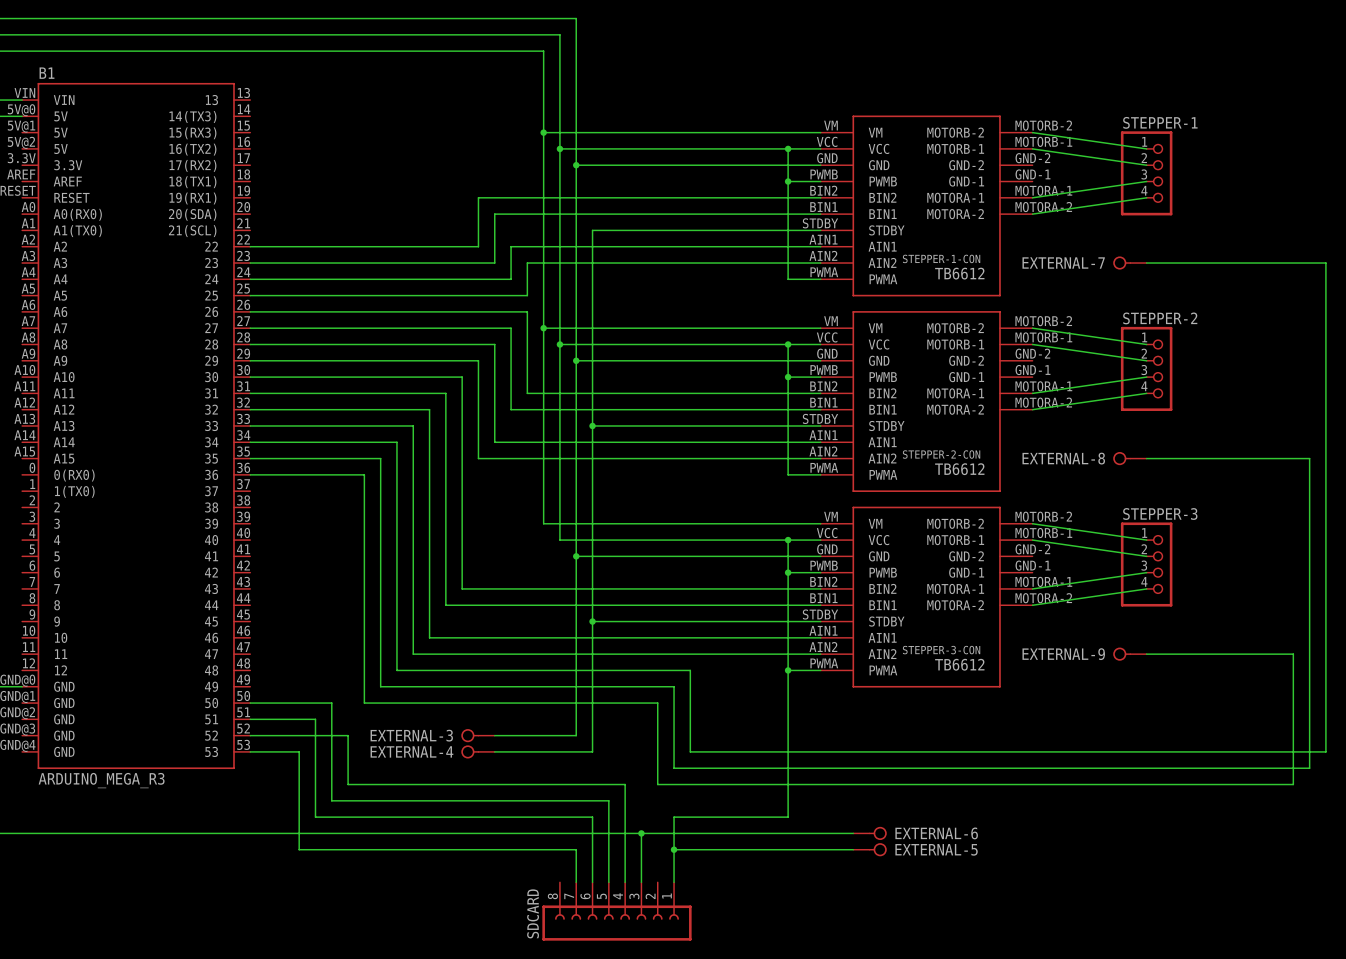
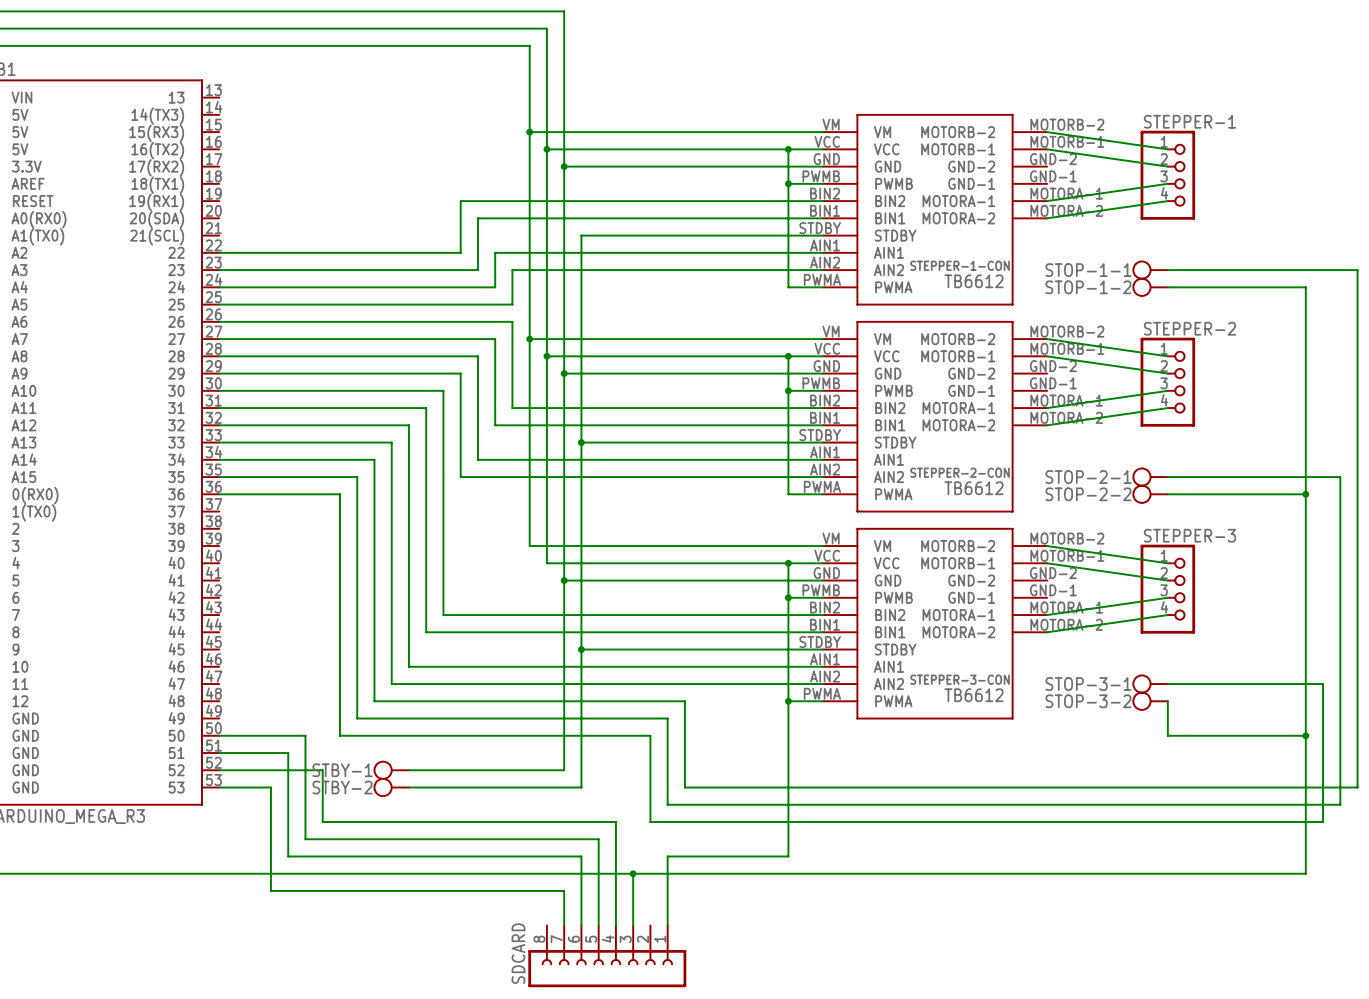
EXTERNAL-7: (1129, 263) -> none
STOP-1-1: none -> (1150, 270)
STOP-1-2: none -> (1150, 287)
wire: none -> (1167, 287) (1305, 287) (1305, 873) (857, 873)
EXTERNAL-8: (1129, 458) -> none
STOP-2-1: none -> (1150, 477)
STOP-2-2: none -> (1150, 494)
wire: none -> (1167, 494) (1305, 494)
junction: none -> (1305, 494)
EXTERNAL-9: (1129, 654) -> none
STOP-3-1: none -> (1150, 684)
STOP-3-2: none -> (1150, 701)
wire: none -> (1167, 701) (1167, 735) (1305, 735)
junction: none -> (1305, 735)
STBY-1: none -> (391, 770)
wire: none -> (408, 770) (477, 770)
EXTERNAL-3: (478, 735) -> none
STBY-2: none -> (391, 787)
wire: none -> (408, 787) (477, 787)
EXTERNAL-4: (478, 751) -> none
EXTERNAL-6: (870, 833) -> none
wire: (674, 849) (853, 849) -> none
junction: (674, 849) -> none
EXTERNAL-5: (870, 849) -> none

